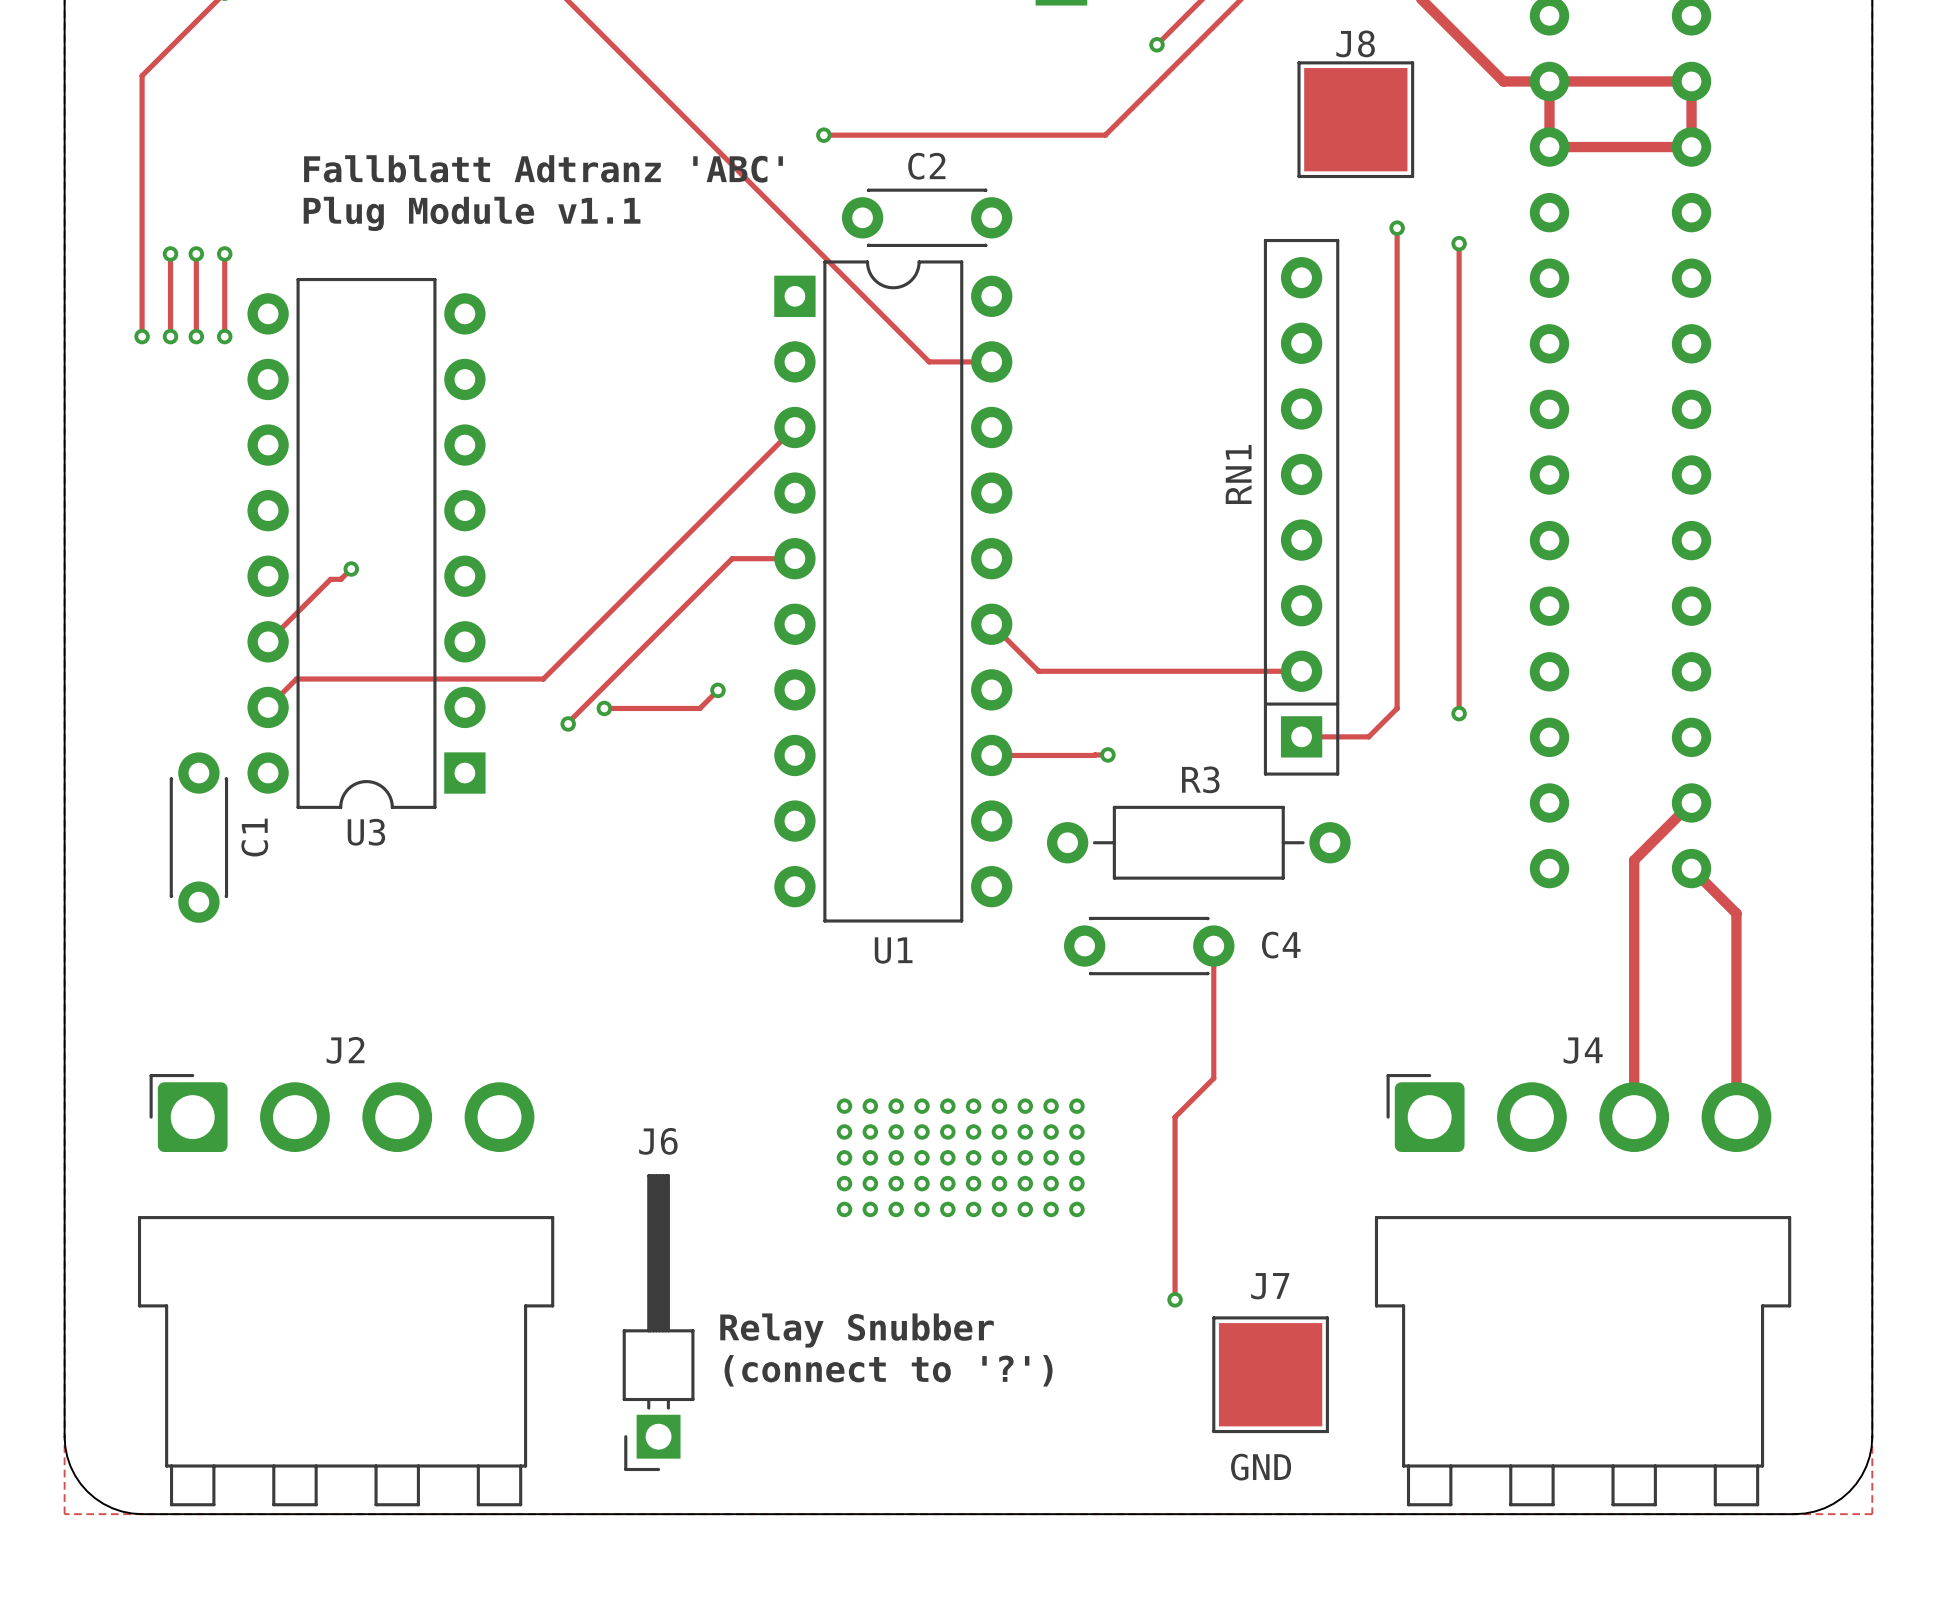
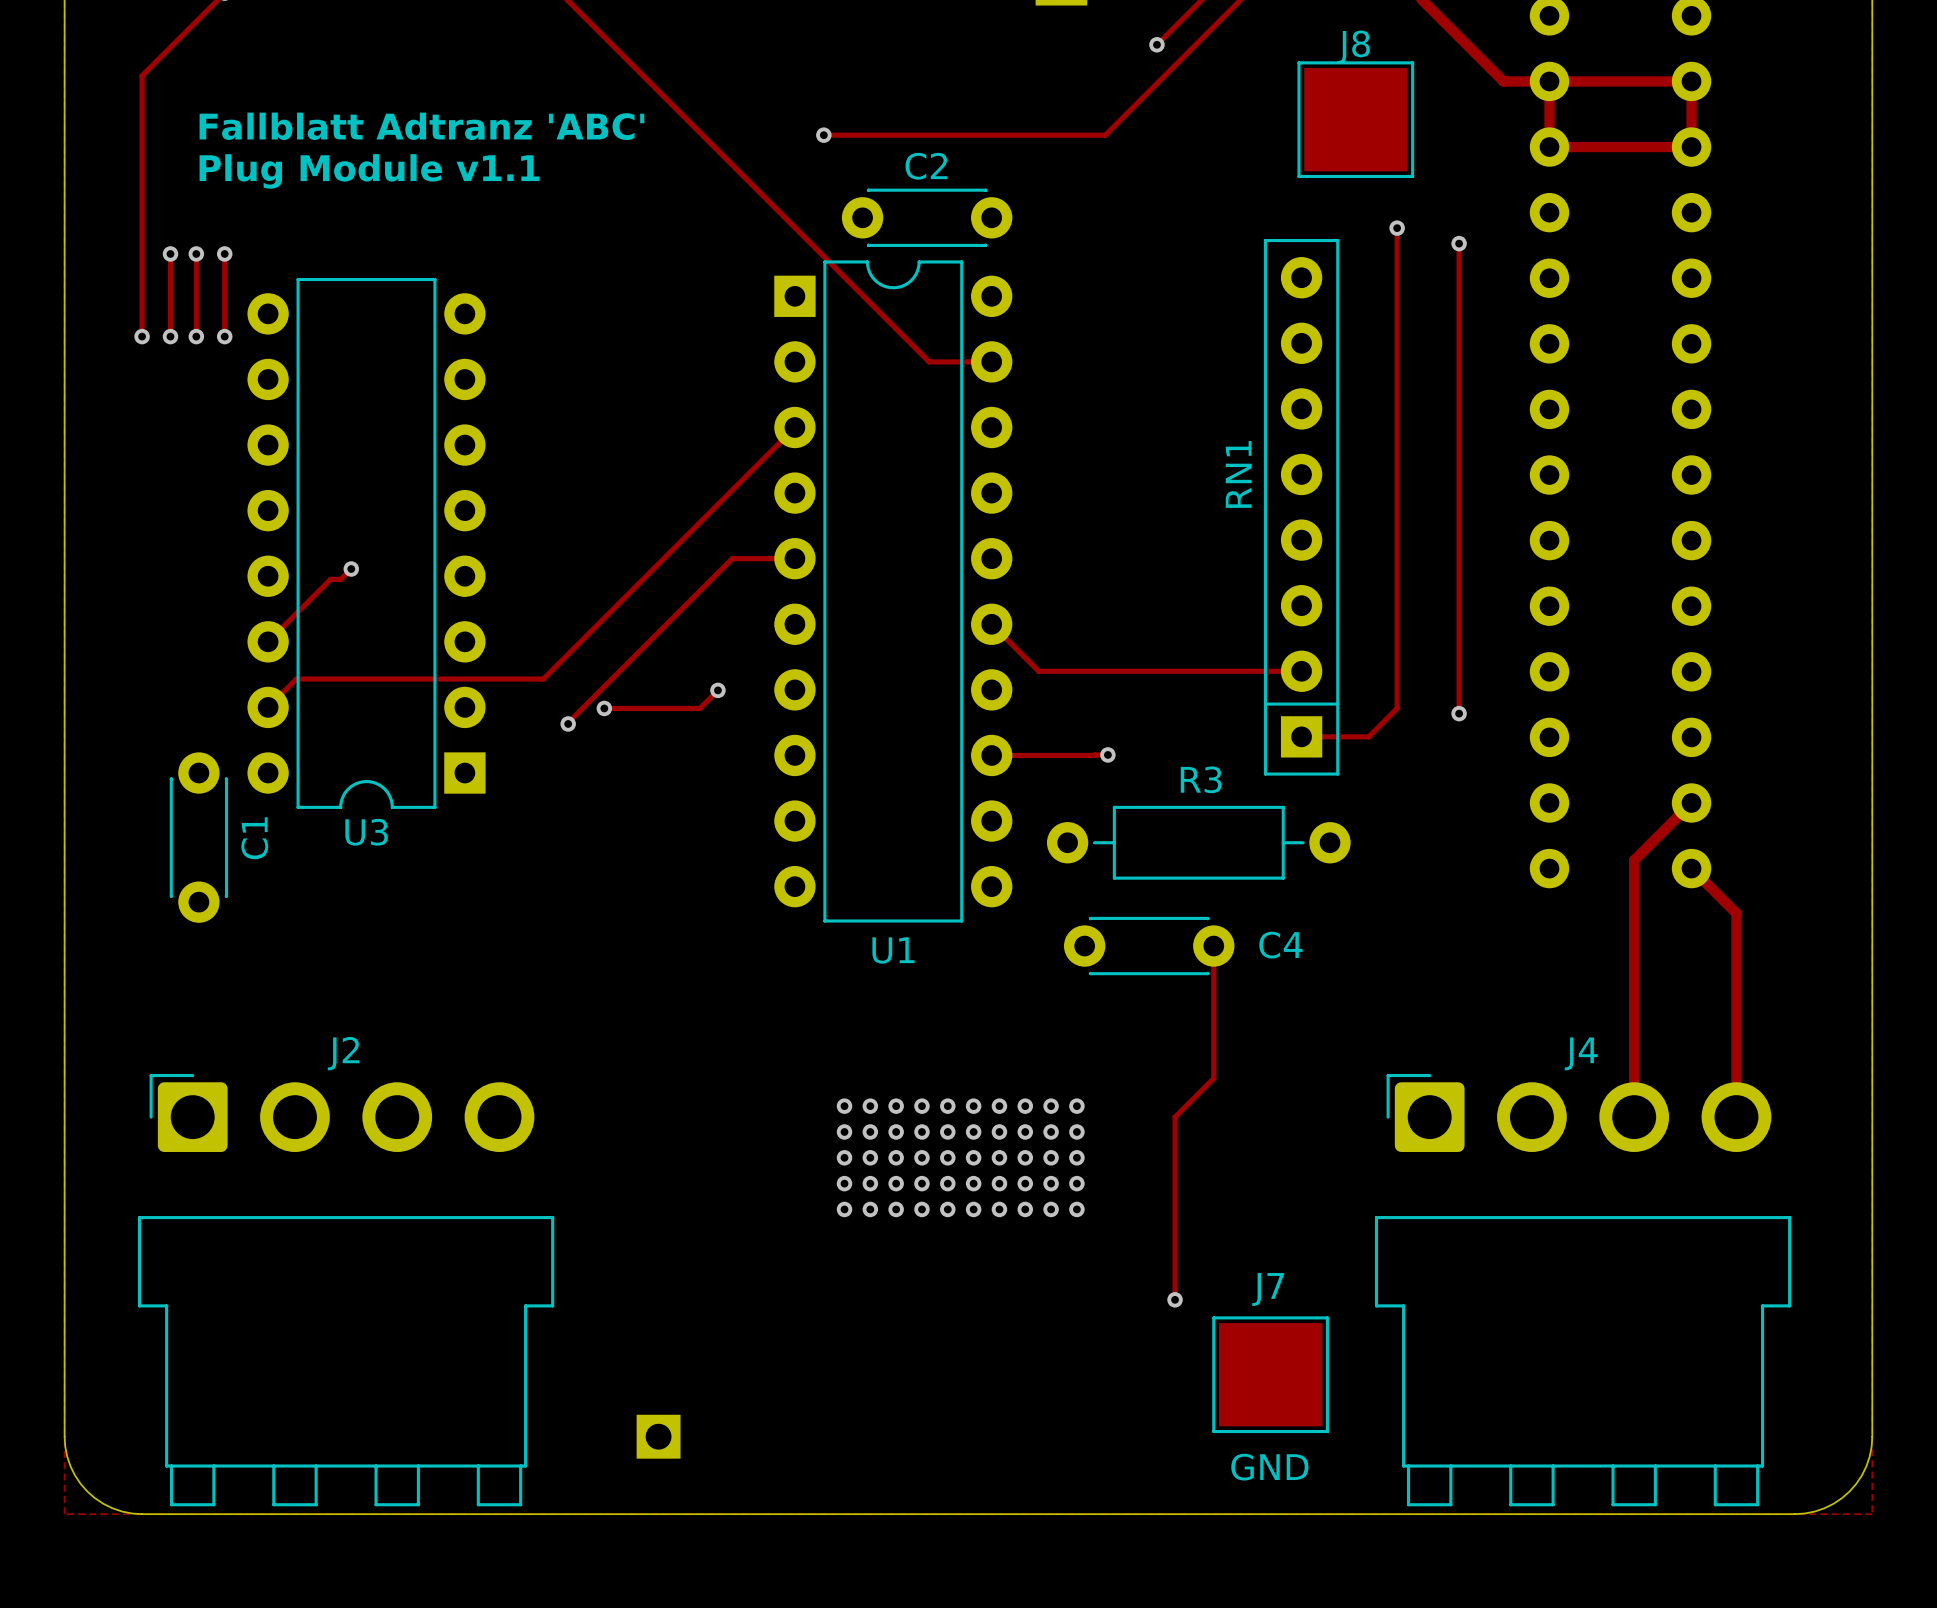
text position: Fallblatt Adtranz 'ABC' (543, 168) -> Fallblatt Adtranz 'ABC' (421, 126)
text position: Plug Module v1.1 (472, 213) -> Plug Module v1.1 (369, 171)
J6 side: top (658, 1322) -> bottom (658, 1436)
text: Relay Snubber (857, 1330) -> none
text: (connect to '?') (888, 1370) -> none

